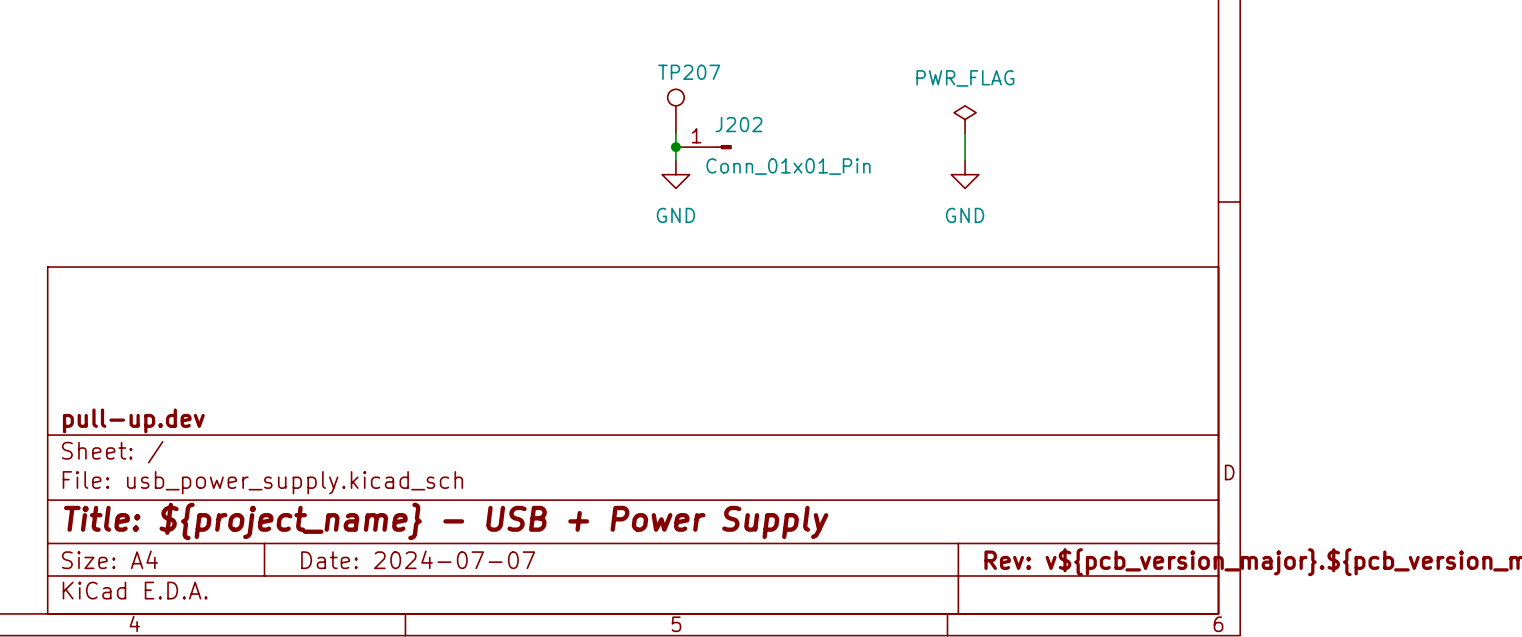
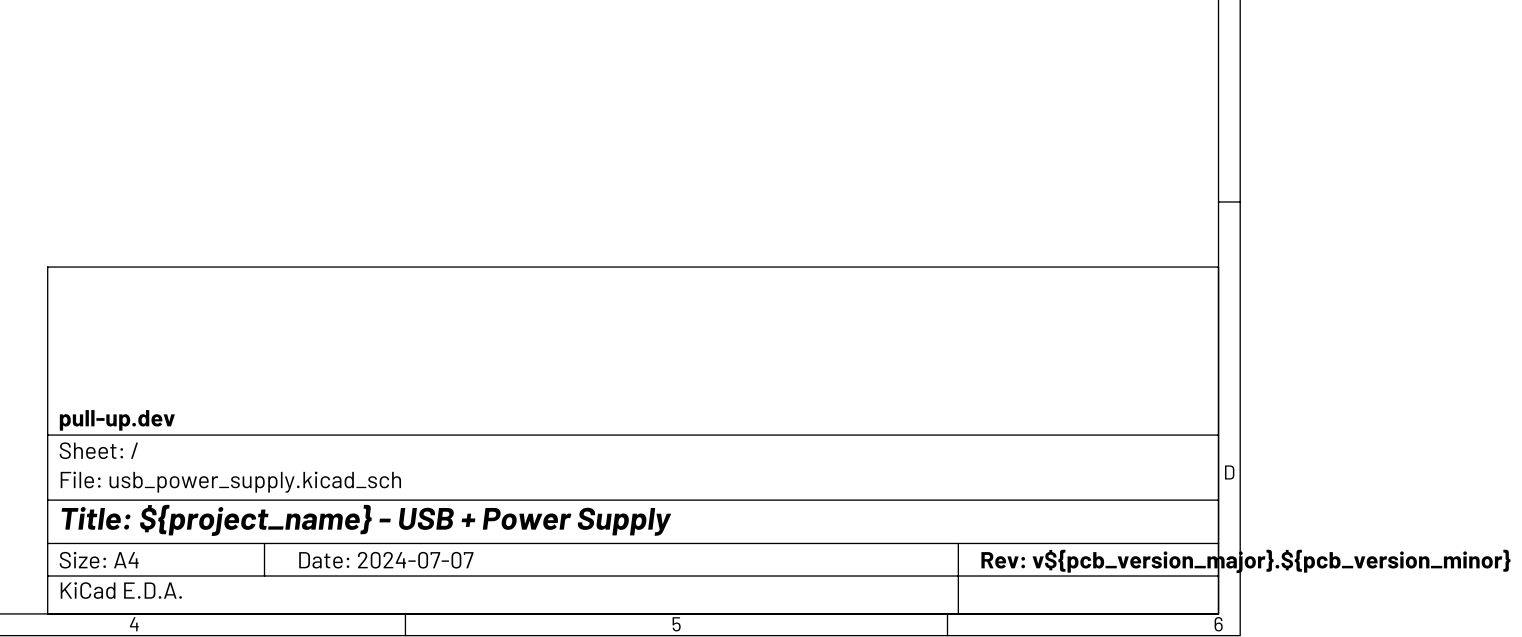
TP207: (675, 111) -> none
power symbol: PWR_FLAG (965, 119) -> none
wire: (675, 133) (675, 160) -> none
wire: (965, 133) (965, 160) -> none
junction: (675, 147) -> none
J202: Conn_01x01_Pin (703, 147) -> none
power symbol: GND (675, 174) -> none
power symbol: GND (965, 174) -> none

